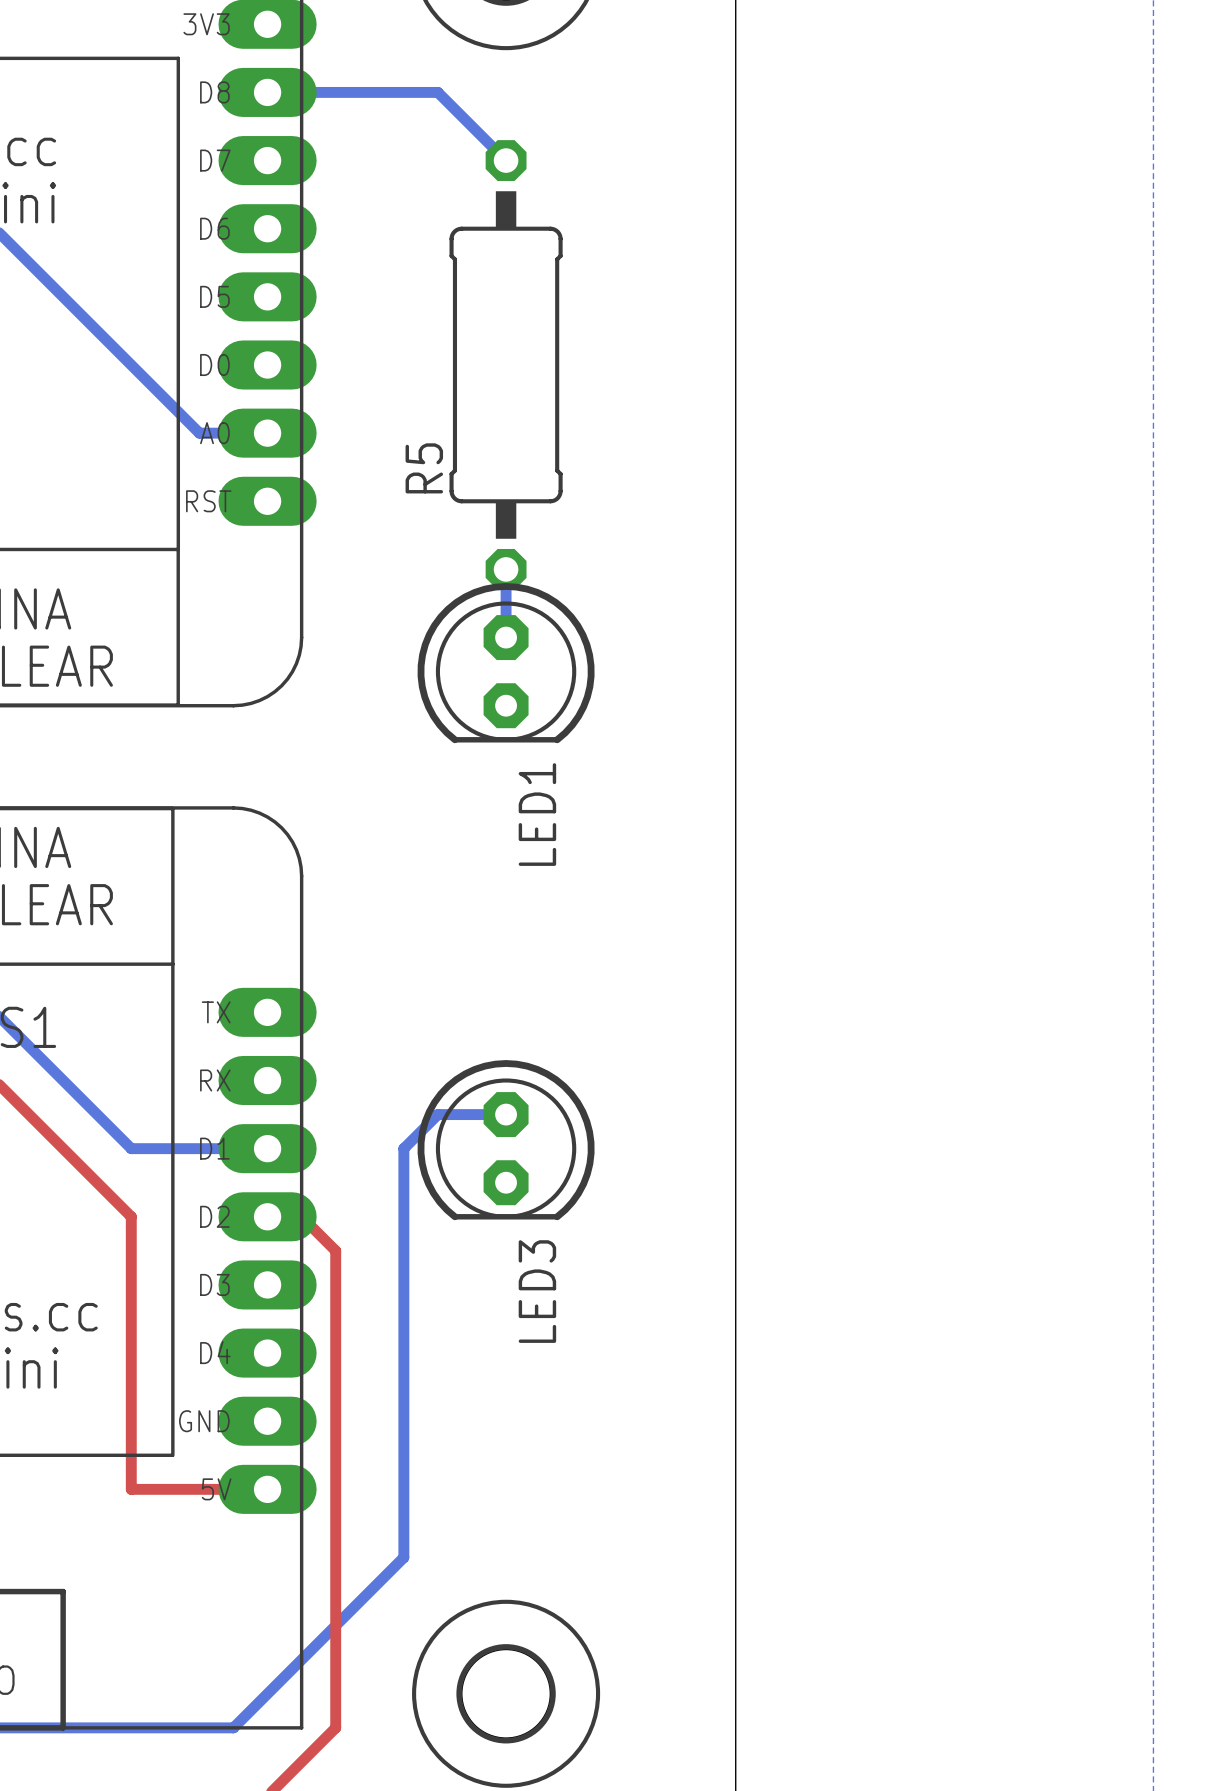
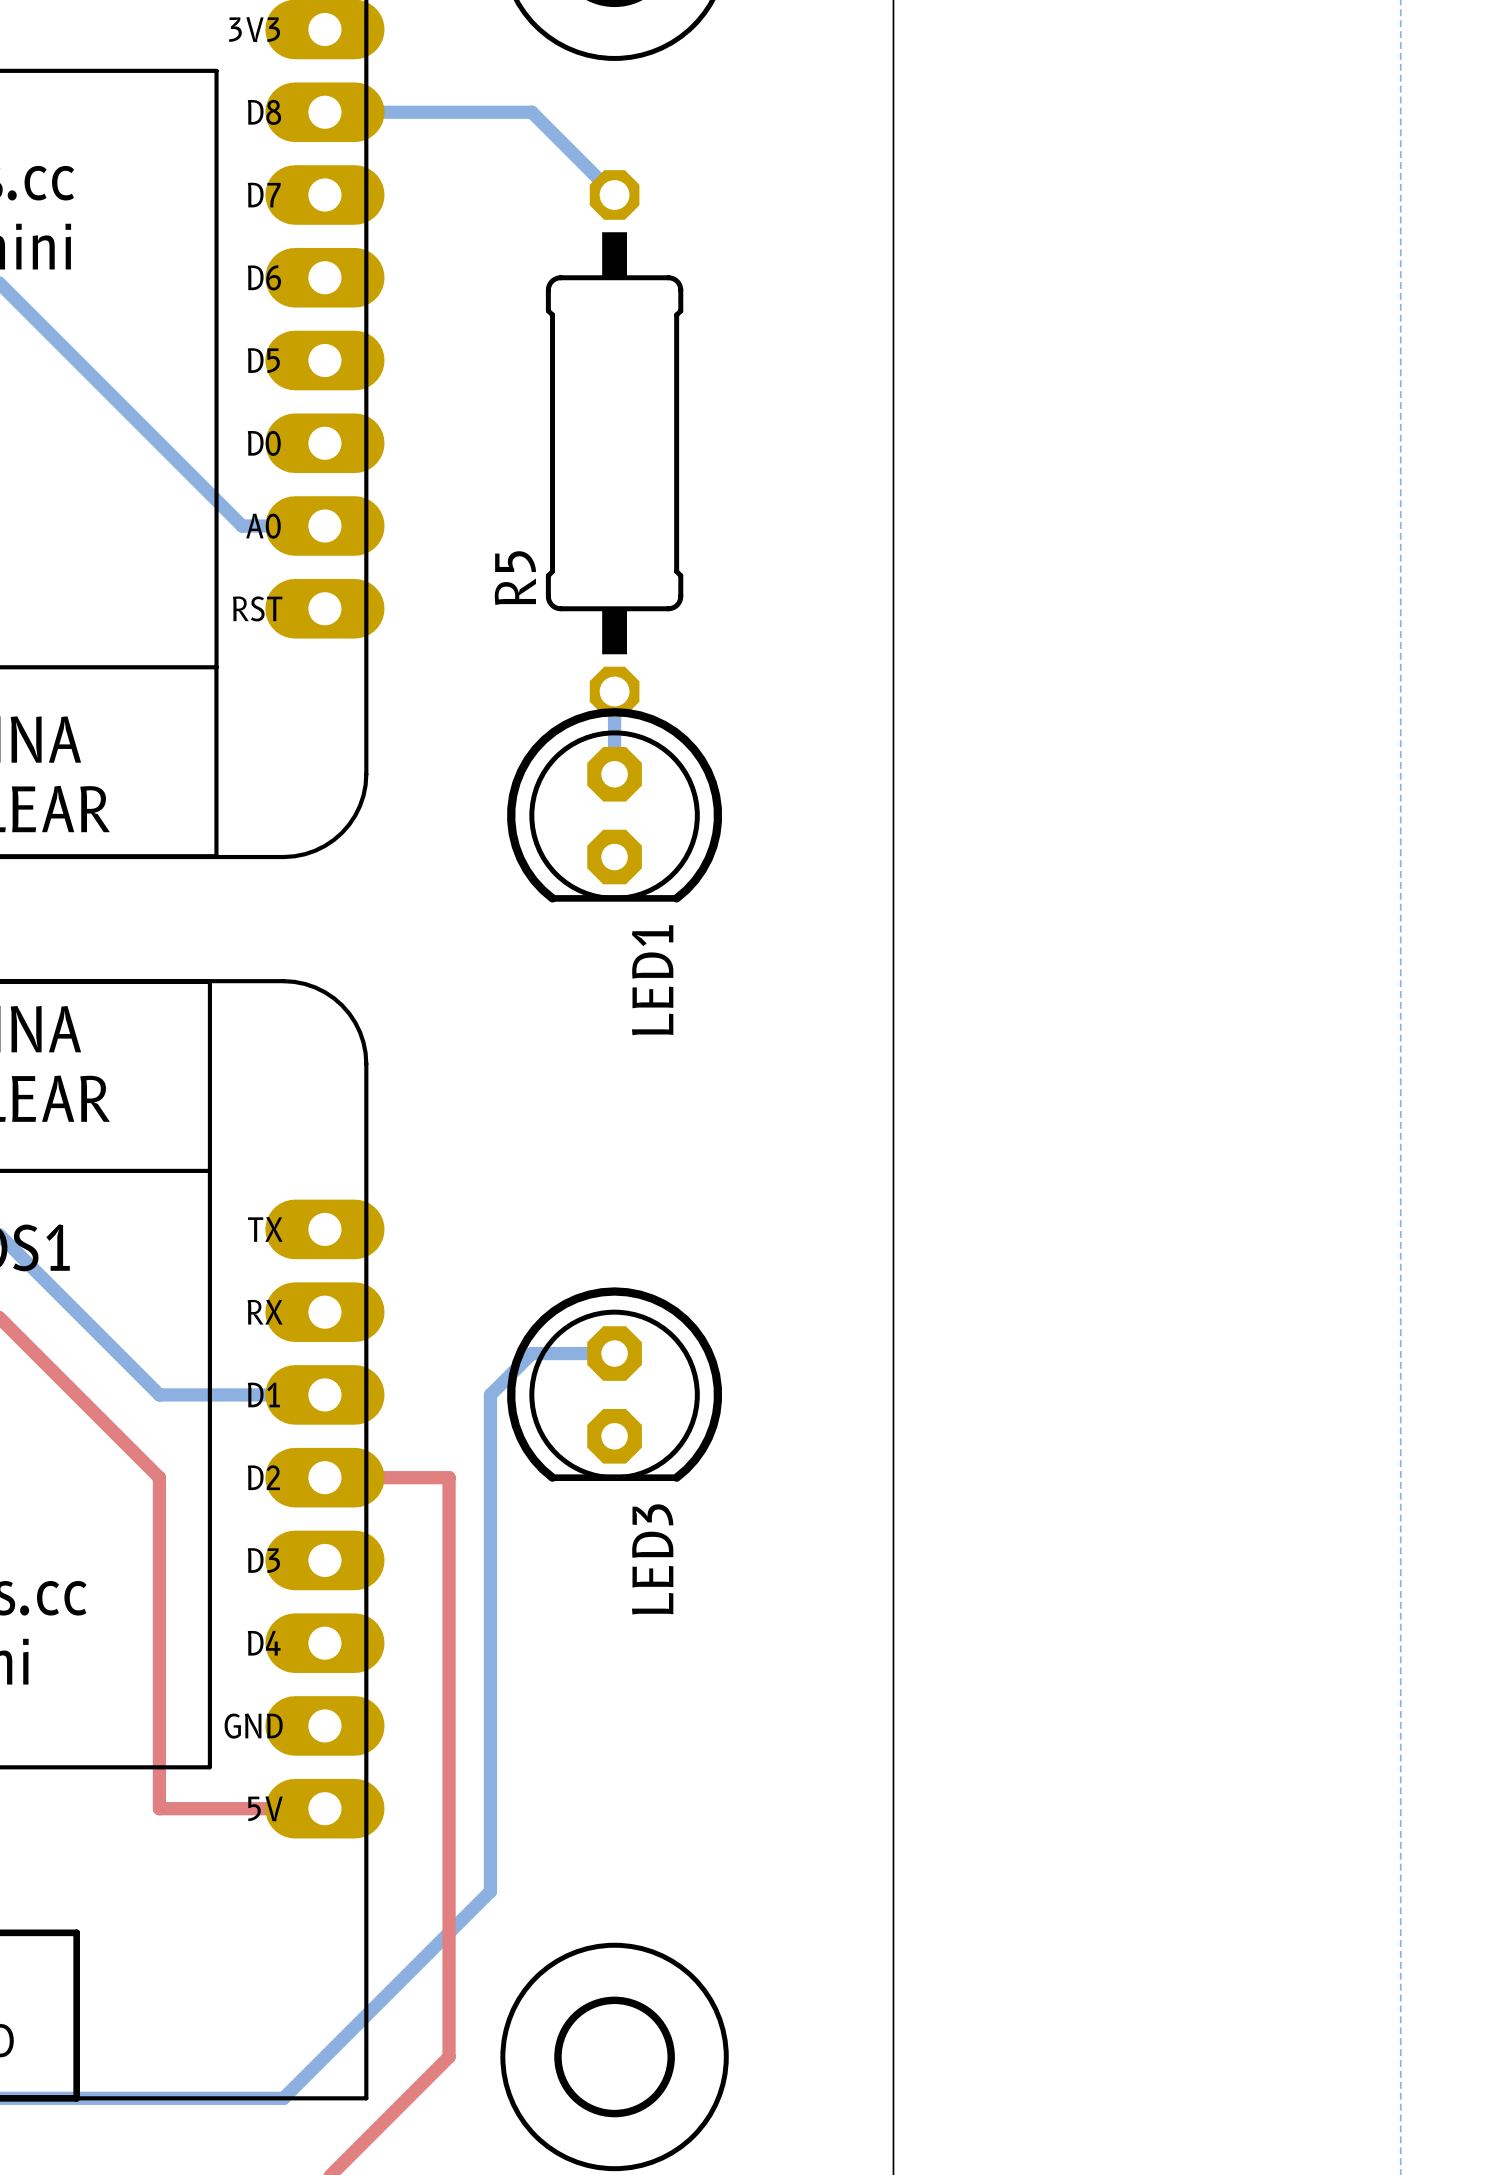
top track: (301, 1216) (335, 1250) (335, 1727) -> (366, 1477) (449, 1477) (449, 2056) (407, 2098)

